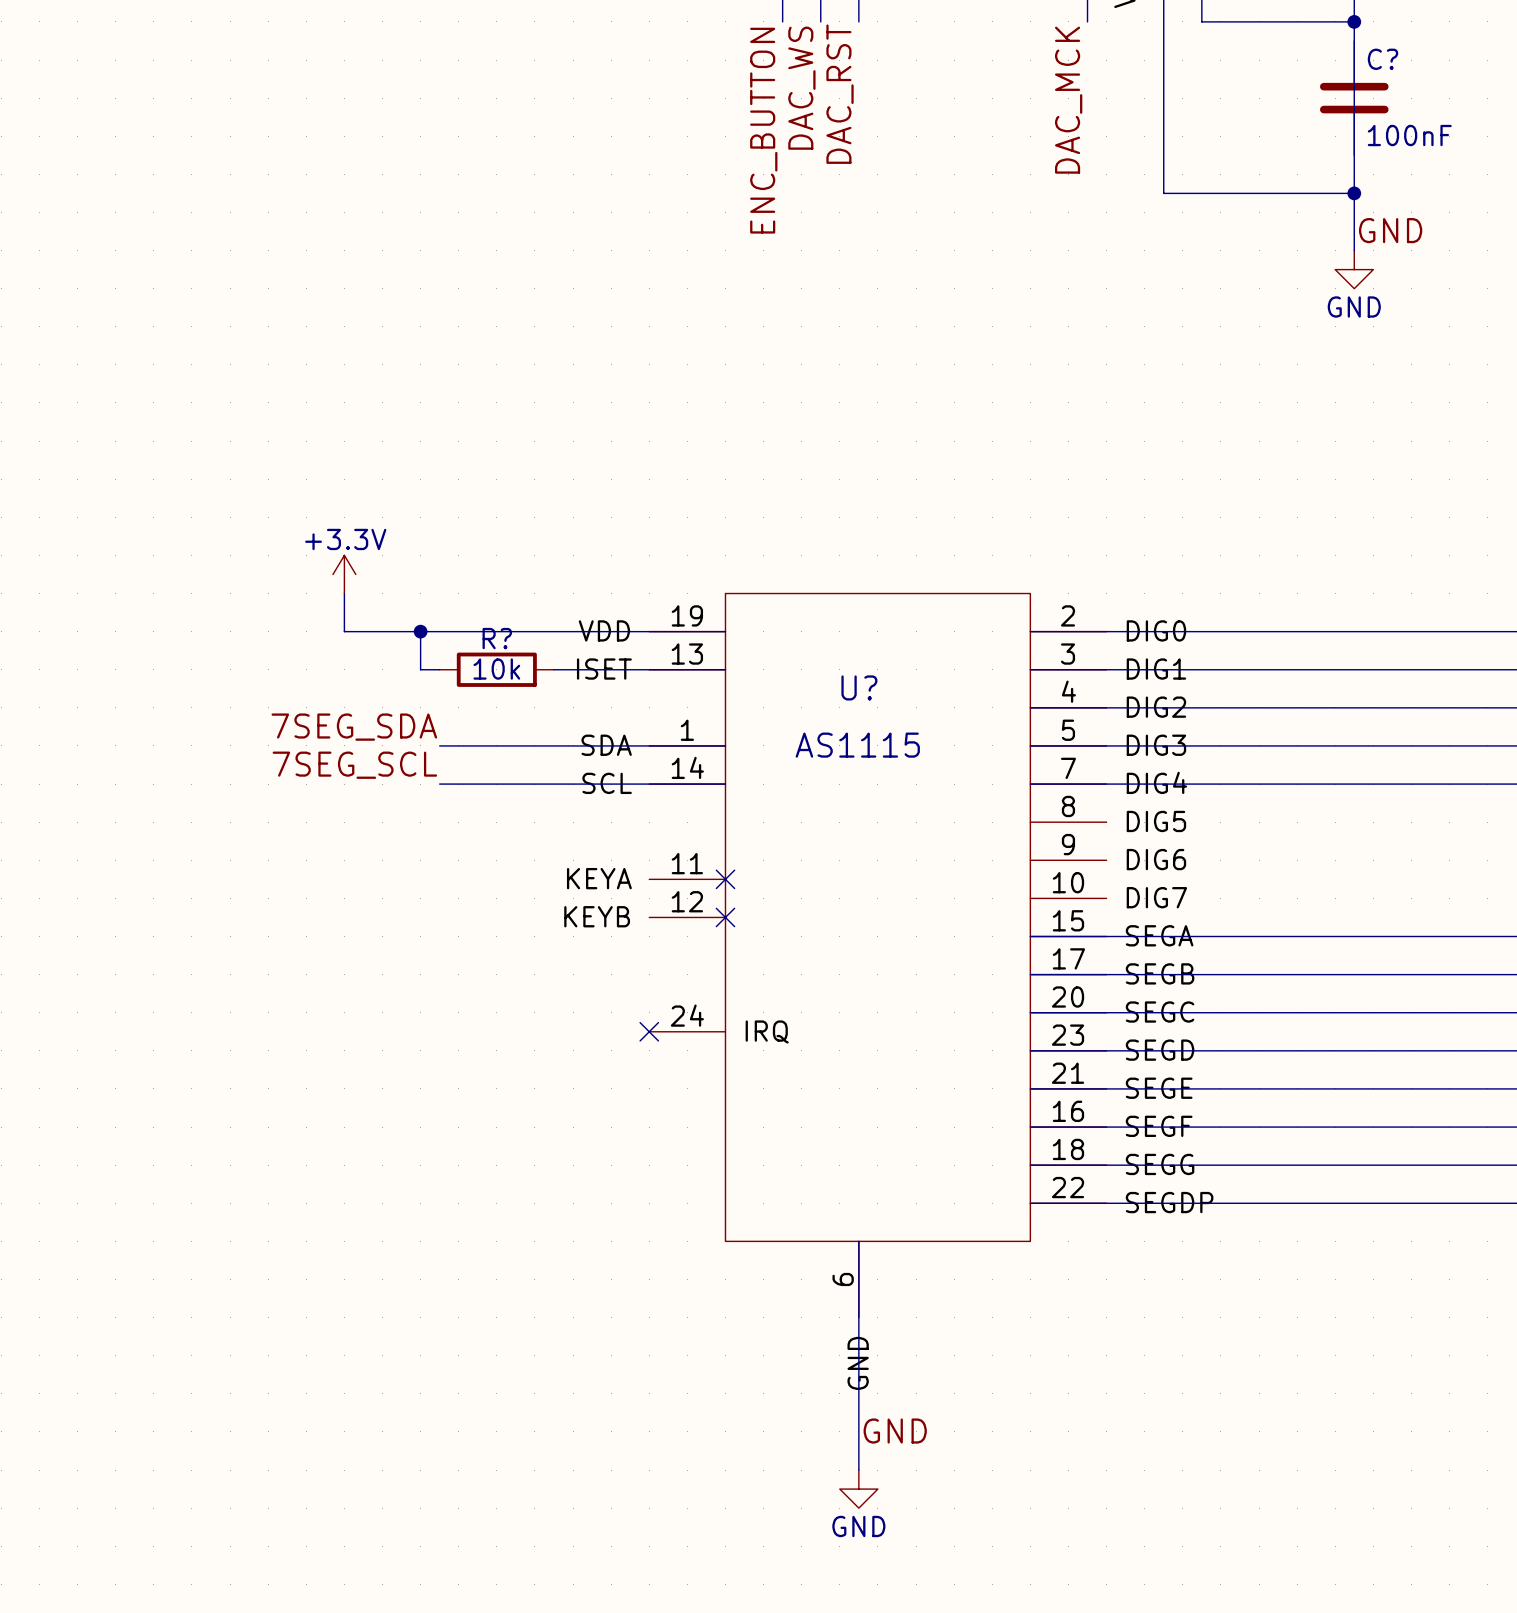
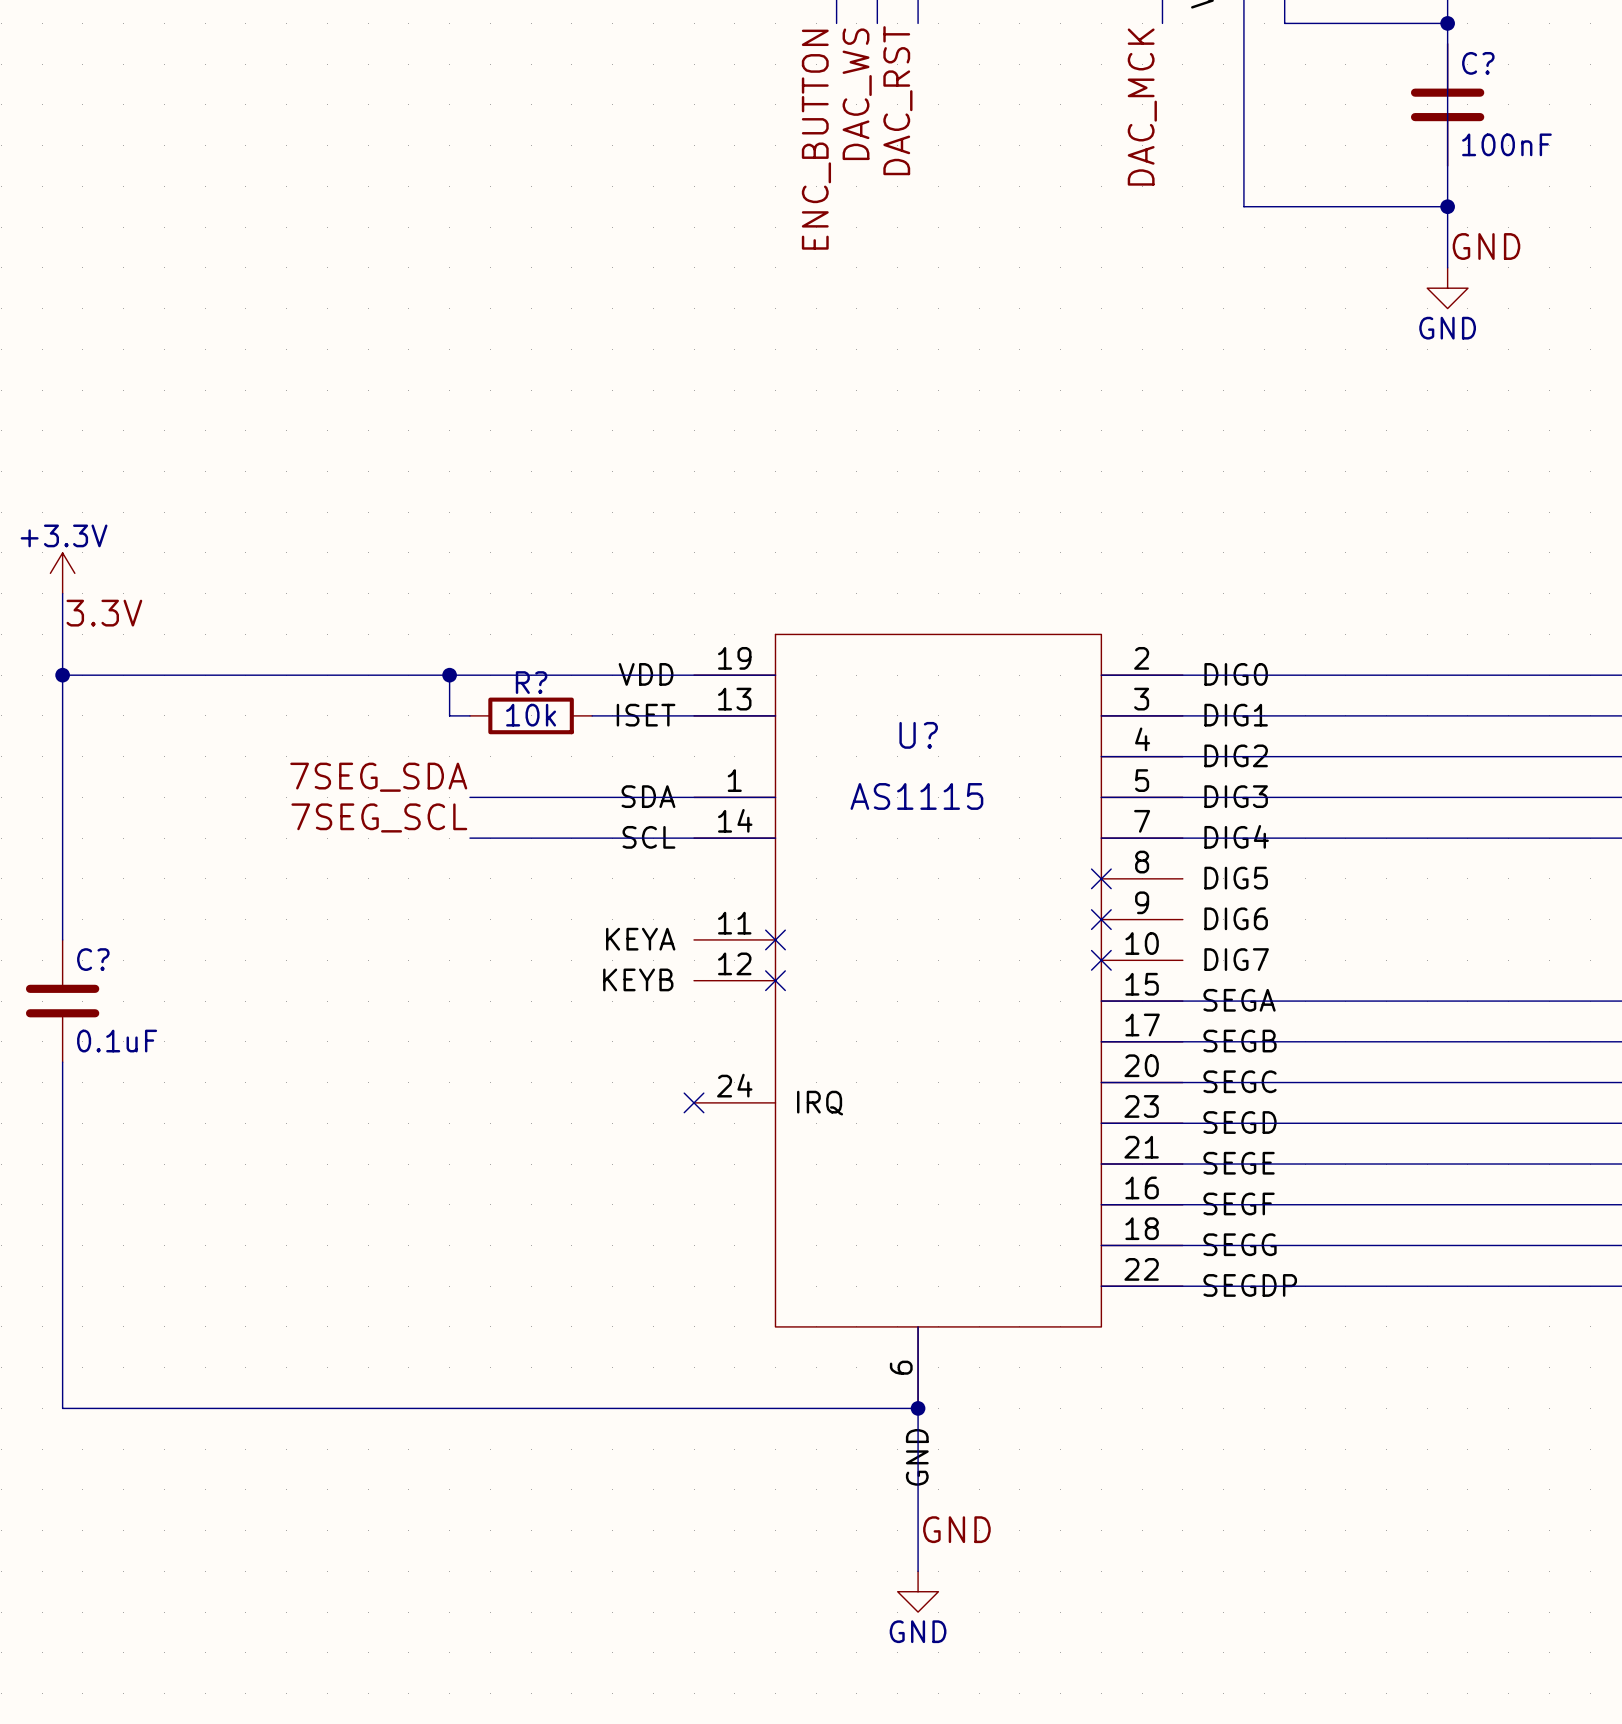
wire: none -> (62, 593) (62, 939)
label: none -> 3.3V (104, 613)
power symbol position: +3.3V (344, 574) -> +3.3V (62, 573)
wire: (344, 593) (344, 631) -> (62, 675) (368, 675)
junction: none -> (62, 675)
no-connect mark: none -> (1101, 878)
no-connect mark: none -> (1101, 919)
no-connect mark: none -> (1101, 960)
C?: none -> 0.1uF (62, 1001)
wire: none -> (62, 1062) (62, 1408) (918, 1408)
junction: none -> (918, 1408)

